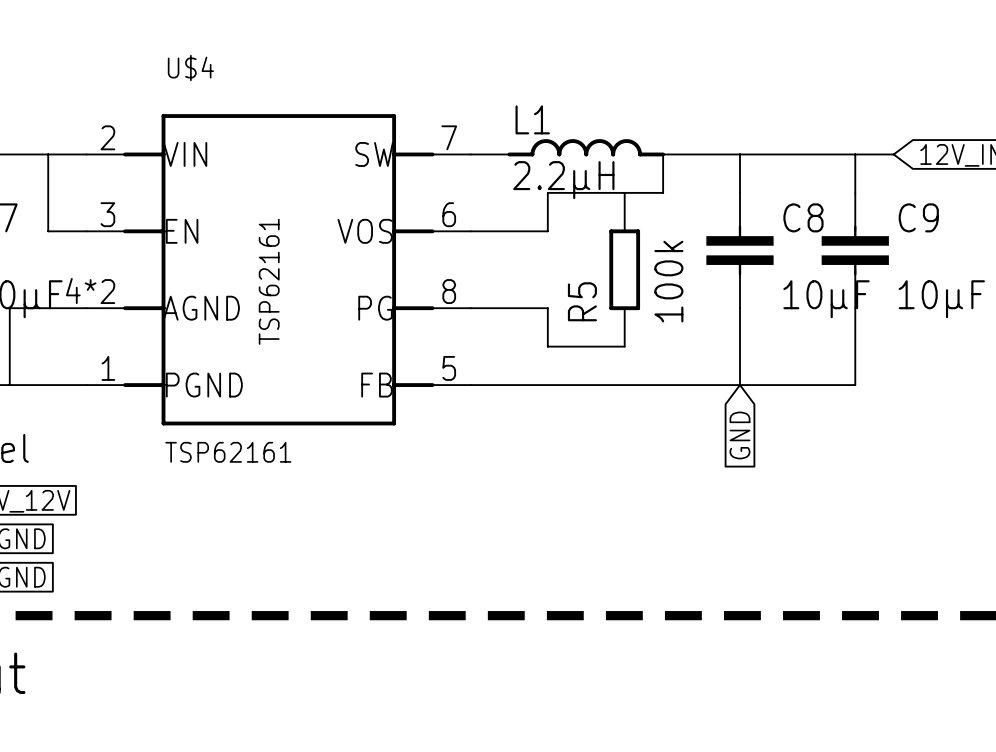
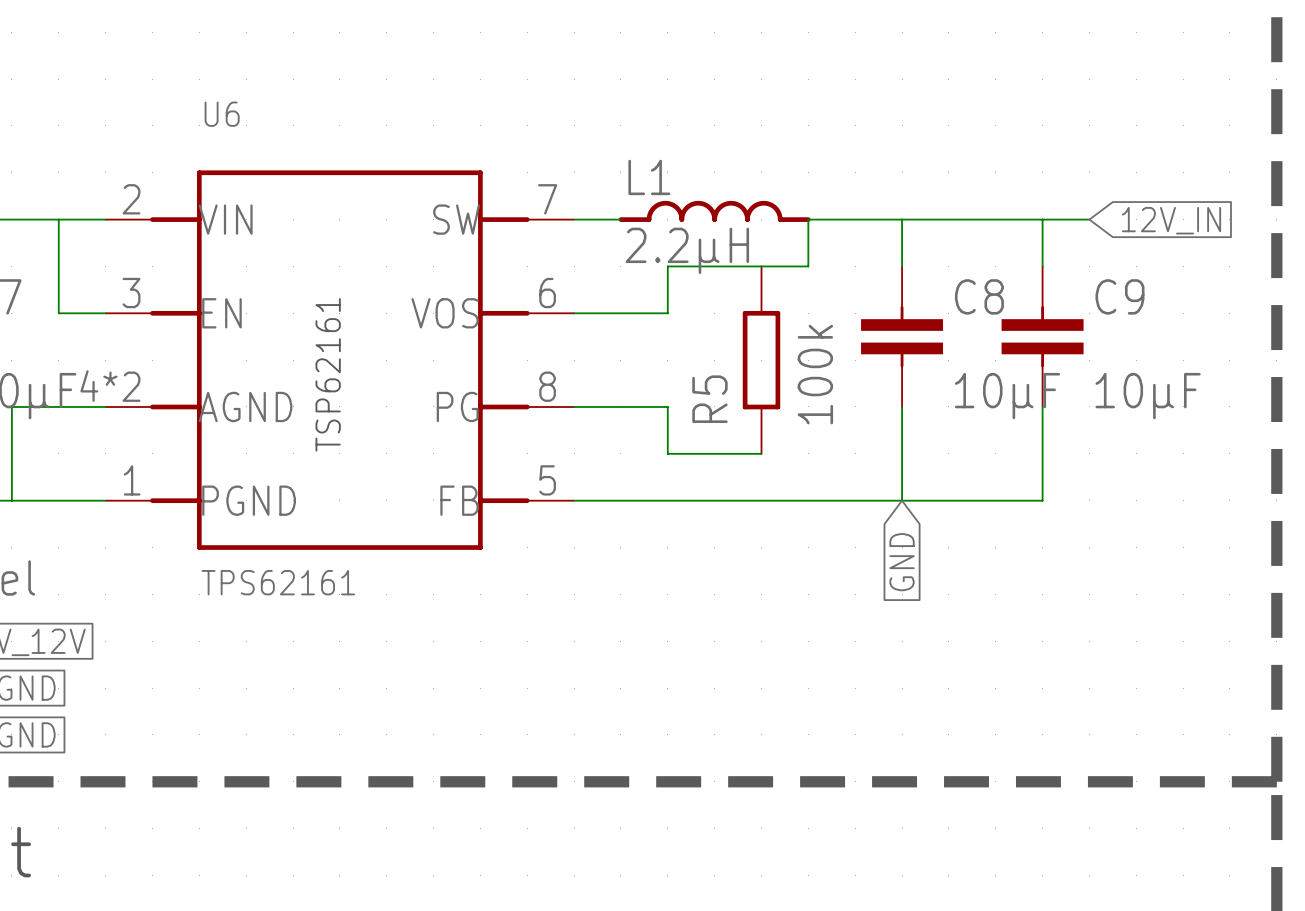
U$4 name: U$4 (190, 67) -> U6 (222, 114)
U$4 value: TSP62161 (228, 452) -> TPS62161 (278, 582)

